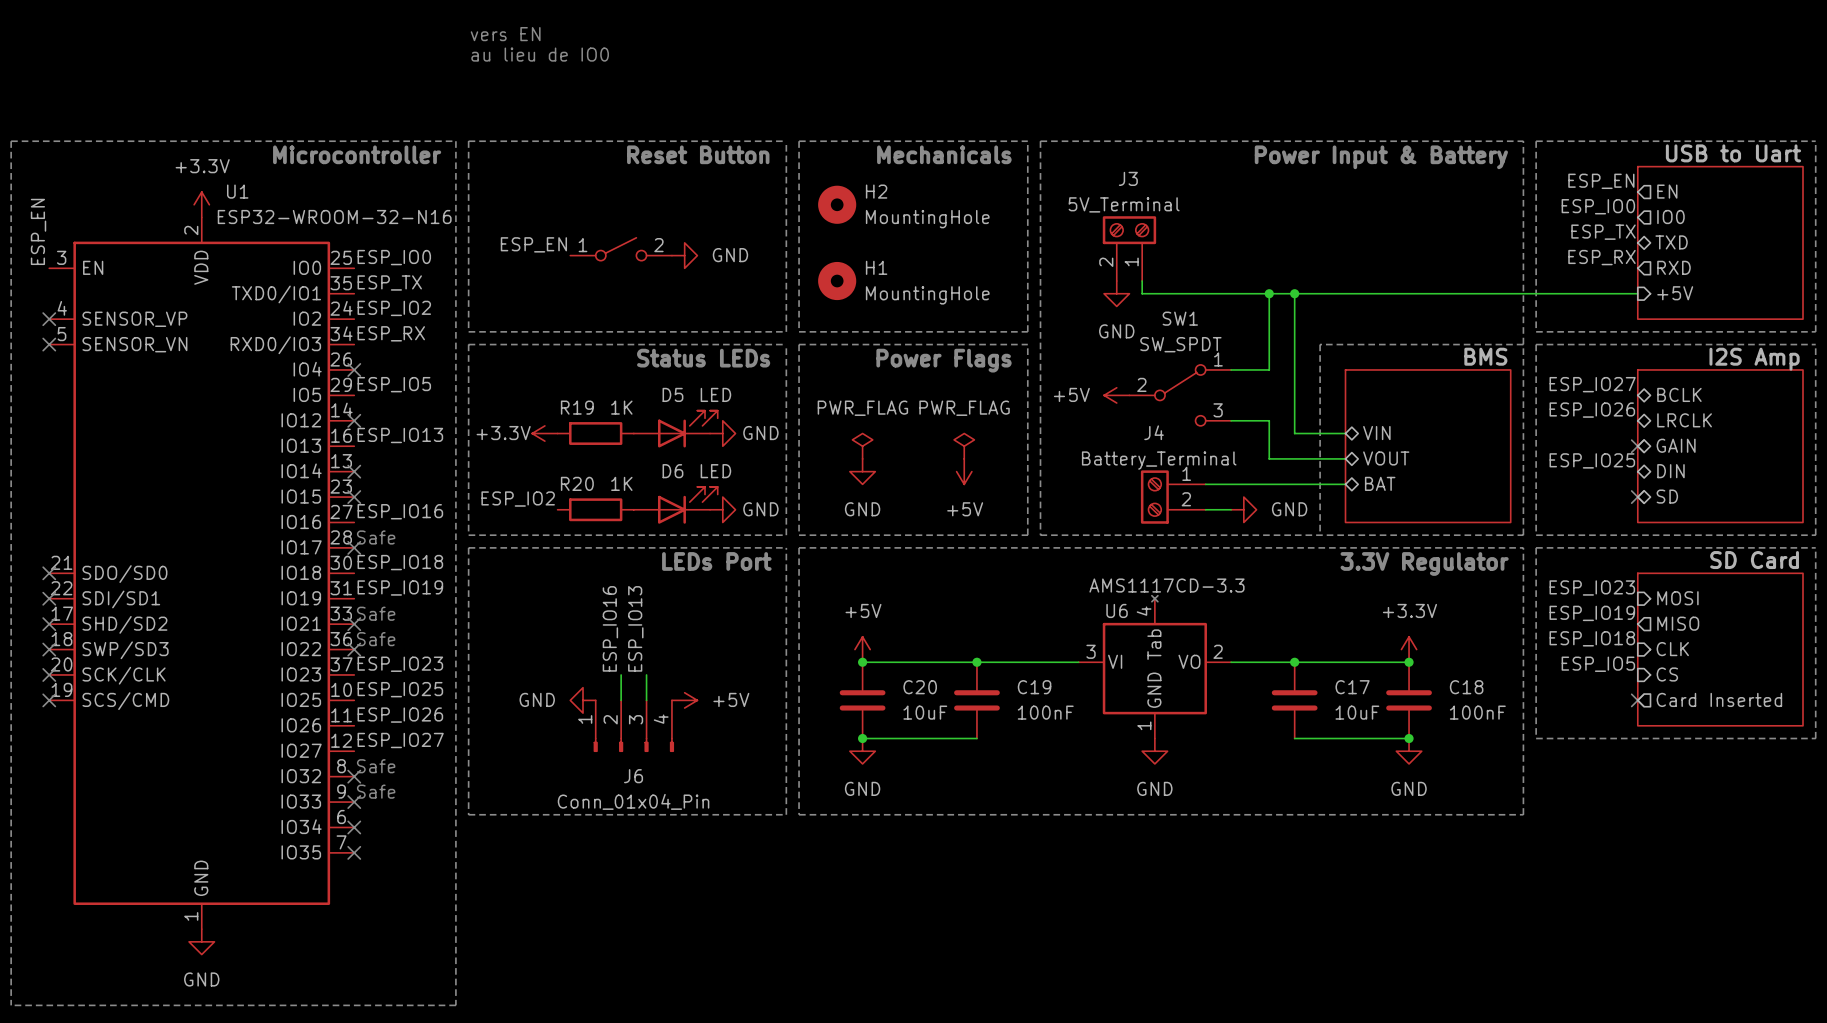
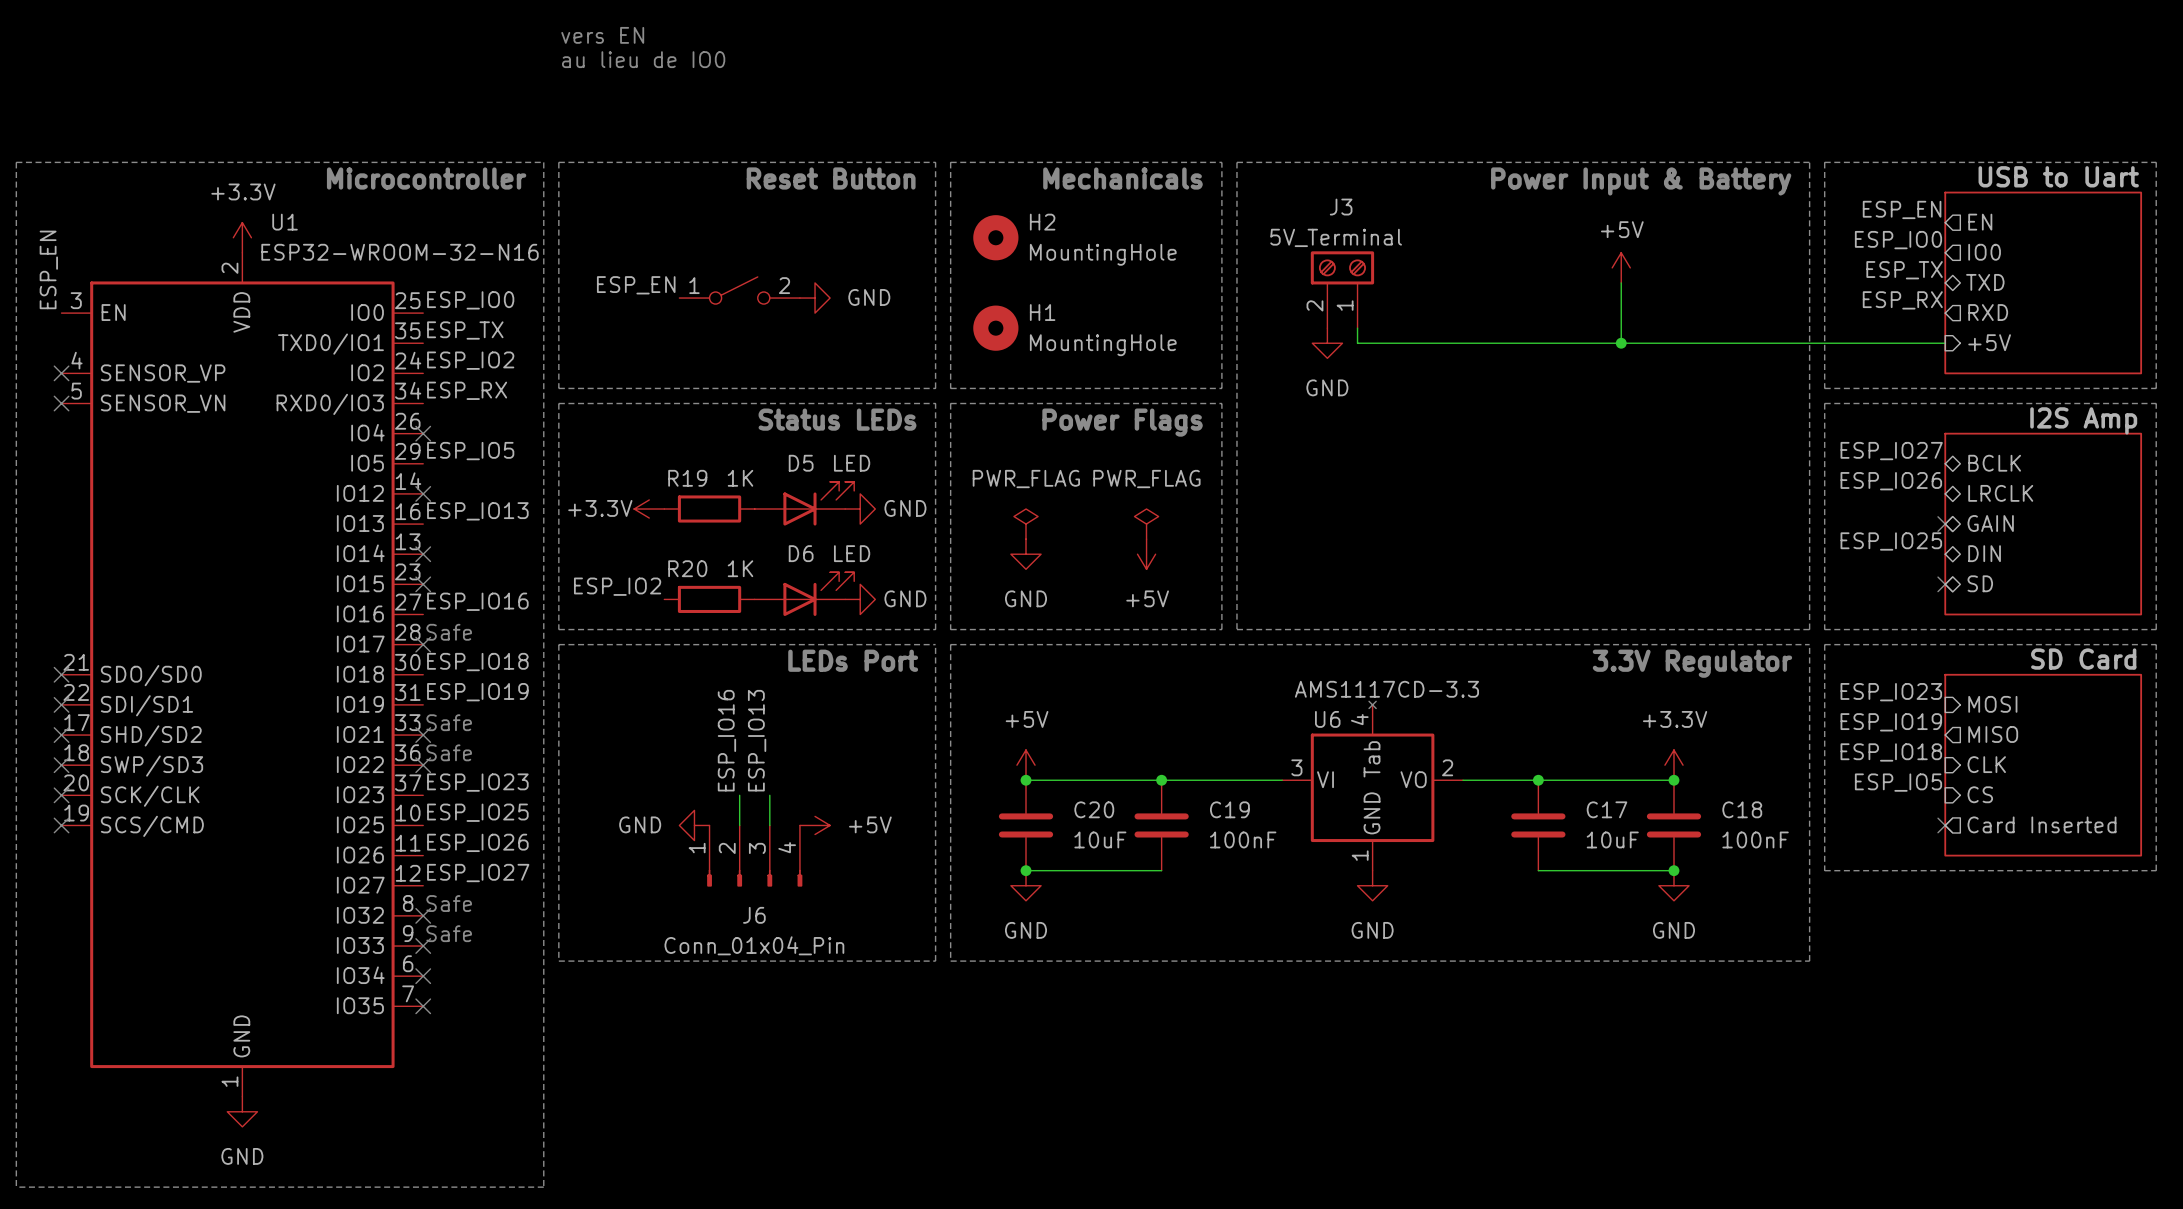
power symbol: none -> +5V (1621, 267)
wire: none -> (1621, 282) (1621, 343)
wire: (1269, 293) (1269, 369) (1231, 369) -> none
junction: (1269, 293) -> none
wire: (1294, 293) (1294, 433) (1345, 433) -> none
junction: (1294, 293) -> none
junction: none -> (1621, 343)
line: (1523, 344) (1320, 344) (1320, 535) -> none
power symbol: +5V (1116, 395) -> none
SW1: SW_SPDT (1180, 395) -> none
wire: (1231, 420) (1269, 420) (1269, 458) (1345, 458) -> none
sheet pin: VIN (1376, 433) -> none
sheet BMS: (1428, 446) -> none
sheet pin: VOUT (1386, 458) -> none
sheet pin: BAT (1380, 483) -> none
wire: (1205, 484) (1345, 484) -> none
J4: Battery_Terminal (1173, 497) -> none
wire: (1205, 509) (1231, 509) -> none
power symbol: GND (1243, 509) -> none

